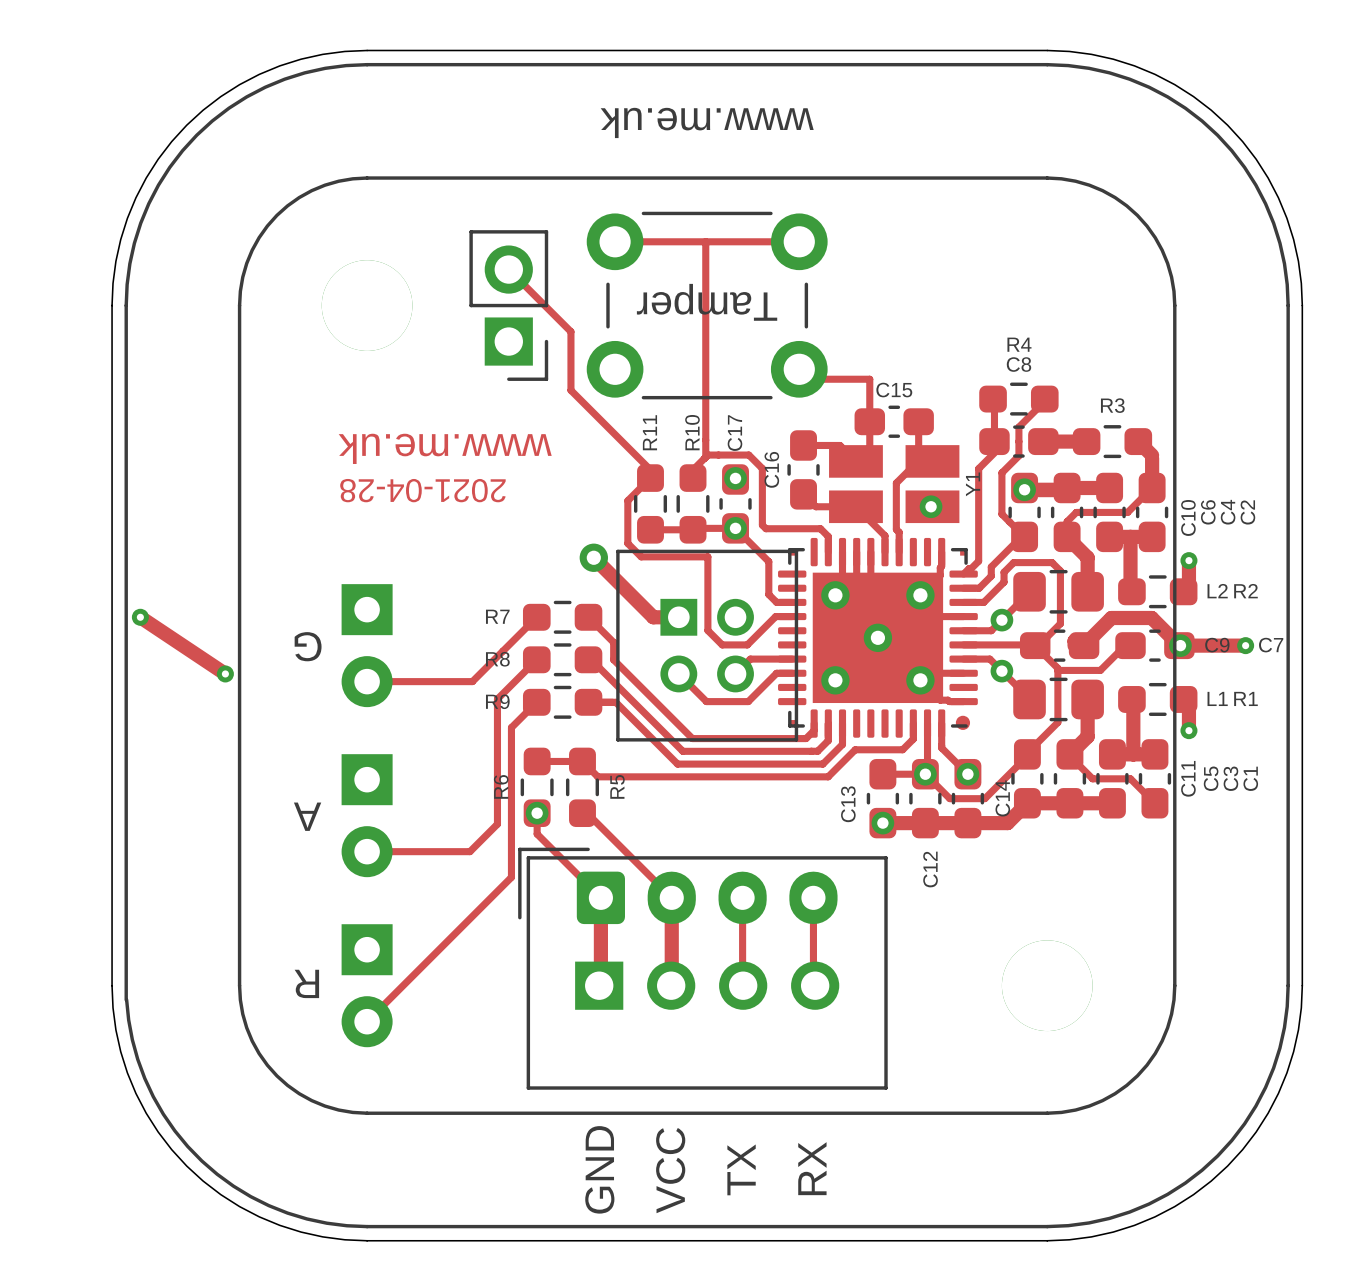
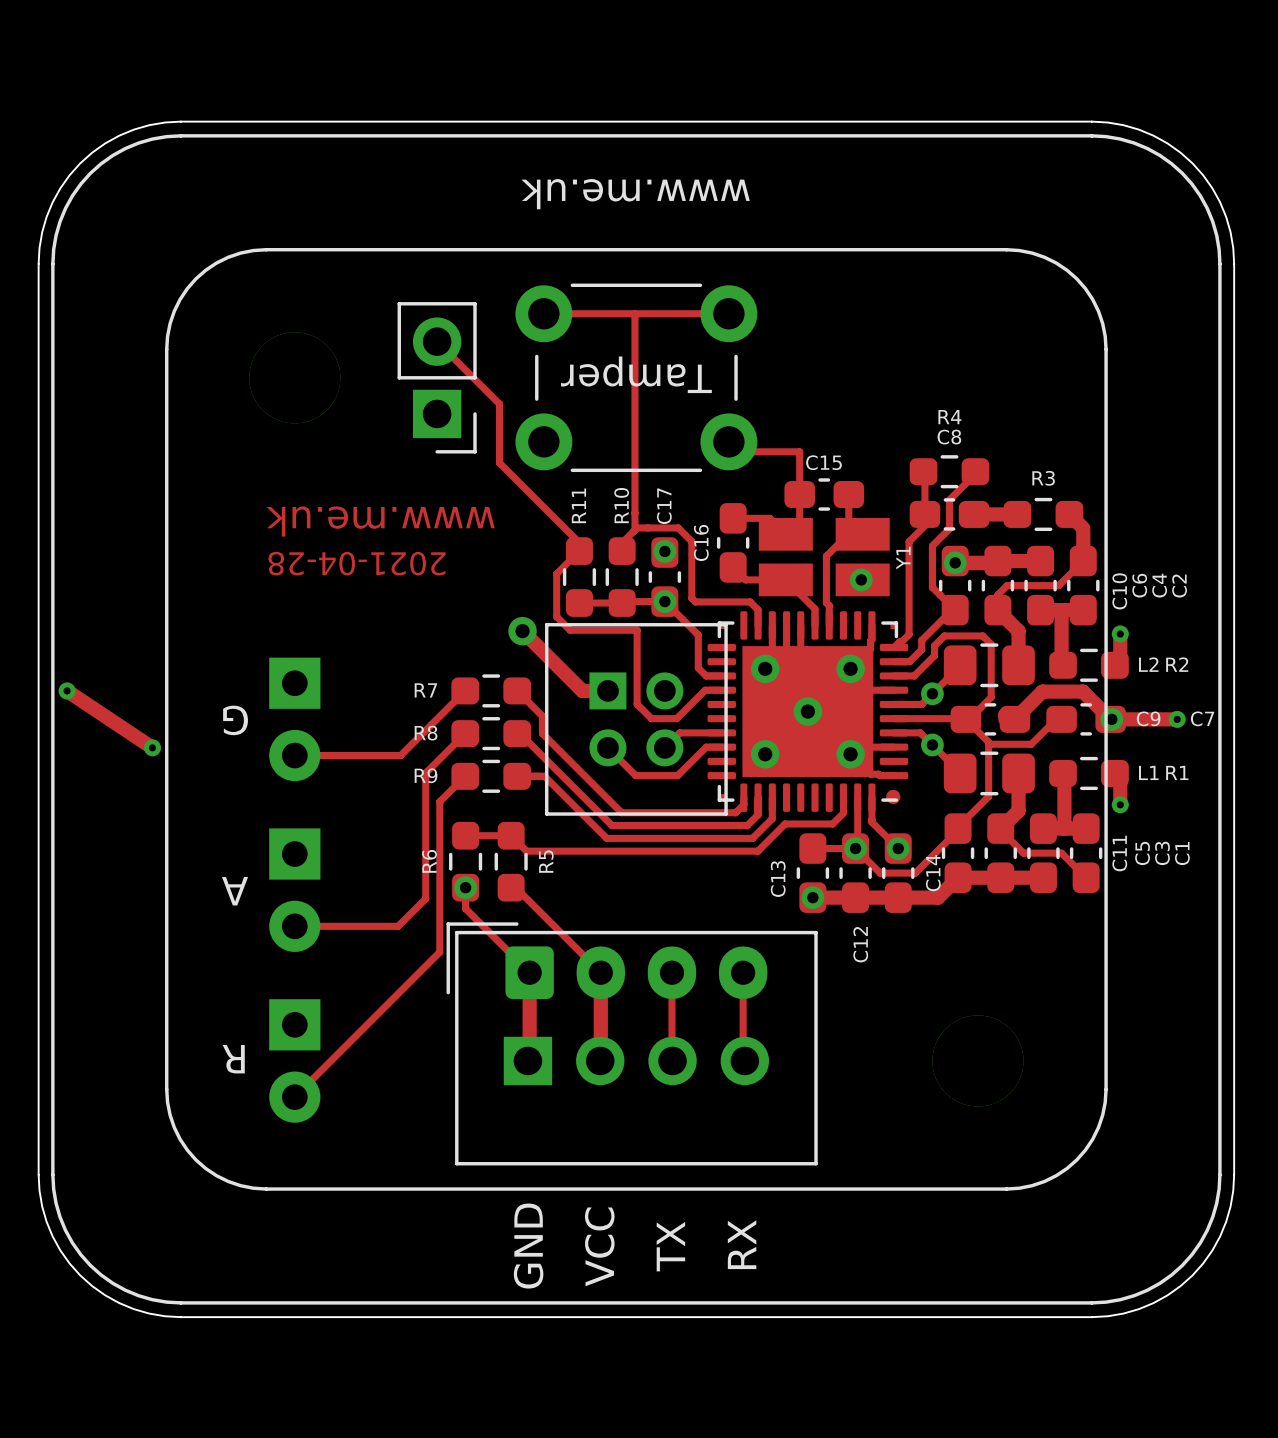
board edge: (367, 50) (322, 54) (279, 65) (239, 84) (203, 110) (186, 125) (158, 159) (135, 197) (120, 239) (115, 261) (112, 305) -> (294, 121) (180, 121) (149, 125) (133, 129) (105, 143) (80, 163) (60, 188) (52, 202) (42, 232) (38, 263) (38, 377)
board edge: (1047, 50) (1091, 54) (1134, 65) (1174, 84) (1211, 110) (1227, 125) (1256, 159) (1278, 197) (1293, 239) (1298, 261) (1302, 305) -> (977, 121) (1091, 121) (1123, 125) (1138, 129) (1167, 143) (1192, 163) (1212, 188) (1220, 202) (1230, 232) (1234, 263) (1234, 377)
part footprint: [124, 62, 1290, 1229] -> [51, 134, 1222, 1305]
board edge: (112, 985) (115, 1029) (120, 1051) (135, 1093) (158, 1132) (186, 1166) (203, 1181) (239, 1206) (279, 1225) (322, 1236) (367, 1240) -> (38, 1060) (38, 1174) (42, 1206) (52, 1236) (60, 1250) (80, 1275) (105, 1295) (133, 1309) (149, 1313) (180, 1317) (294, 1317)
board edge: (1302, 985) (1298, 1029) (1293, 1051) (1278, 1093) (1256, 1132) (1227, 1166) (1211, 1181) (1174, 1206) (1134, 1225) (1091, 1236) (1047, 1240) -> (1234, 1060) (1234, 1174) (1230, 1206) (1220, 1236) (1212, 1250) (1192, 1275) (1167, 1295) (1138, 1309) (1123, 1313) (1091, 1317) (977, 1317)

